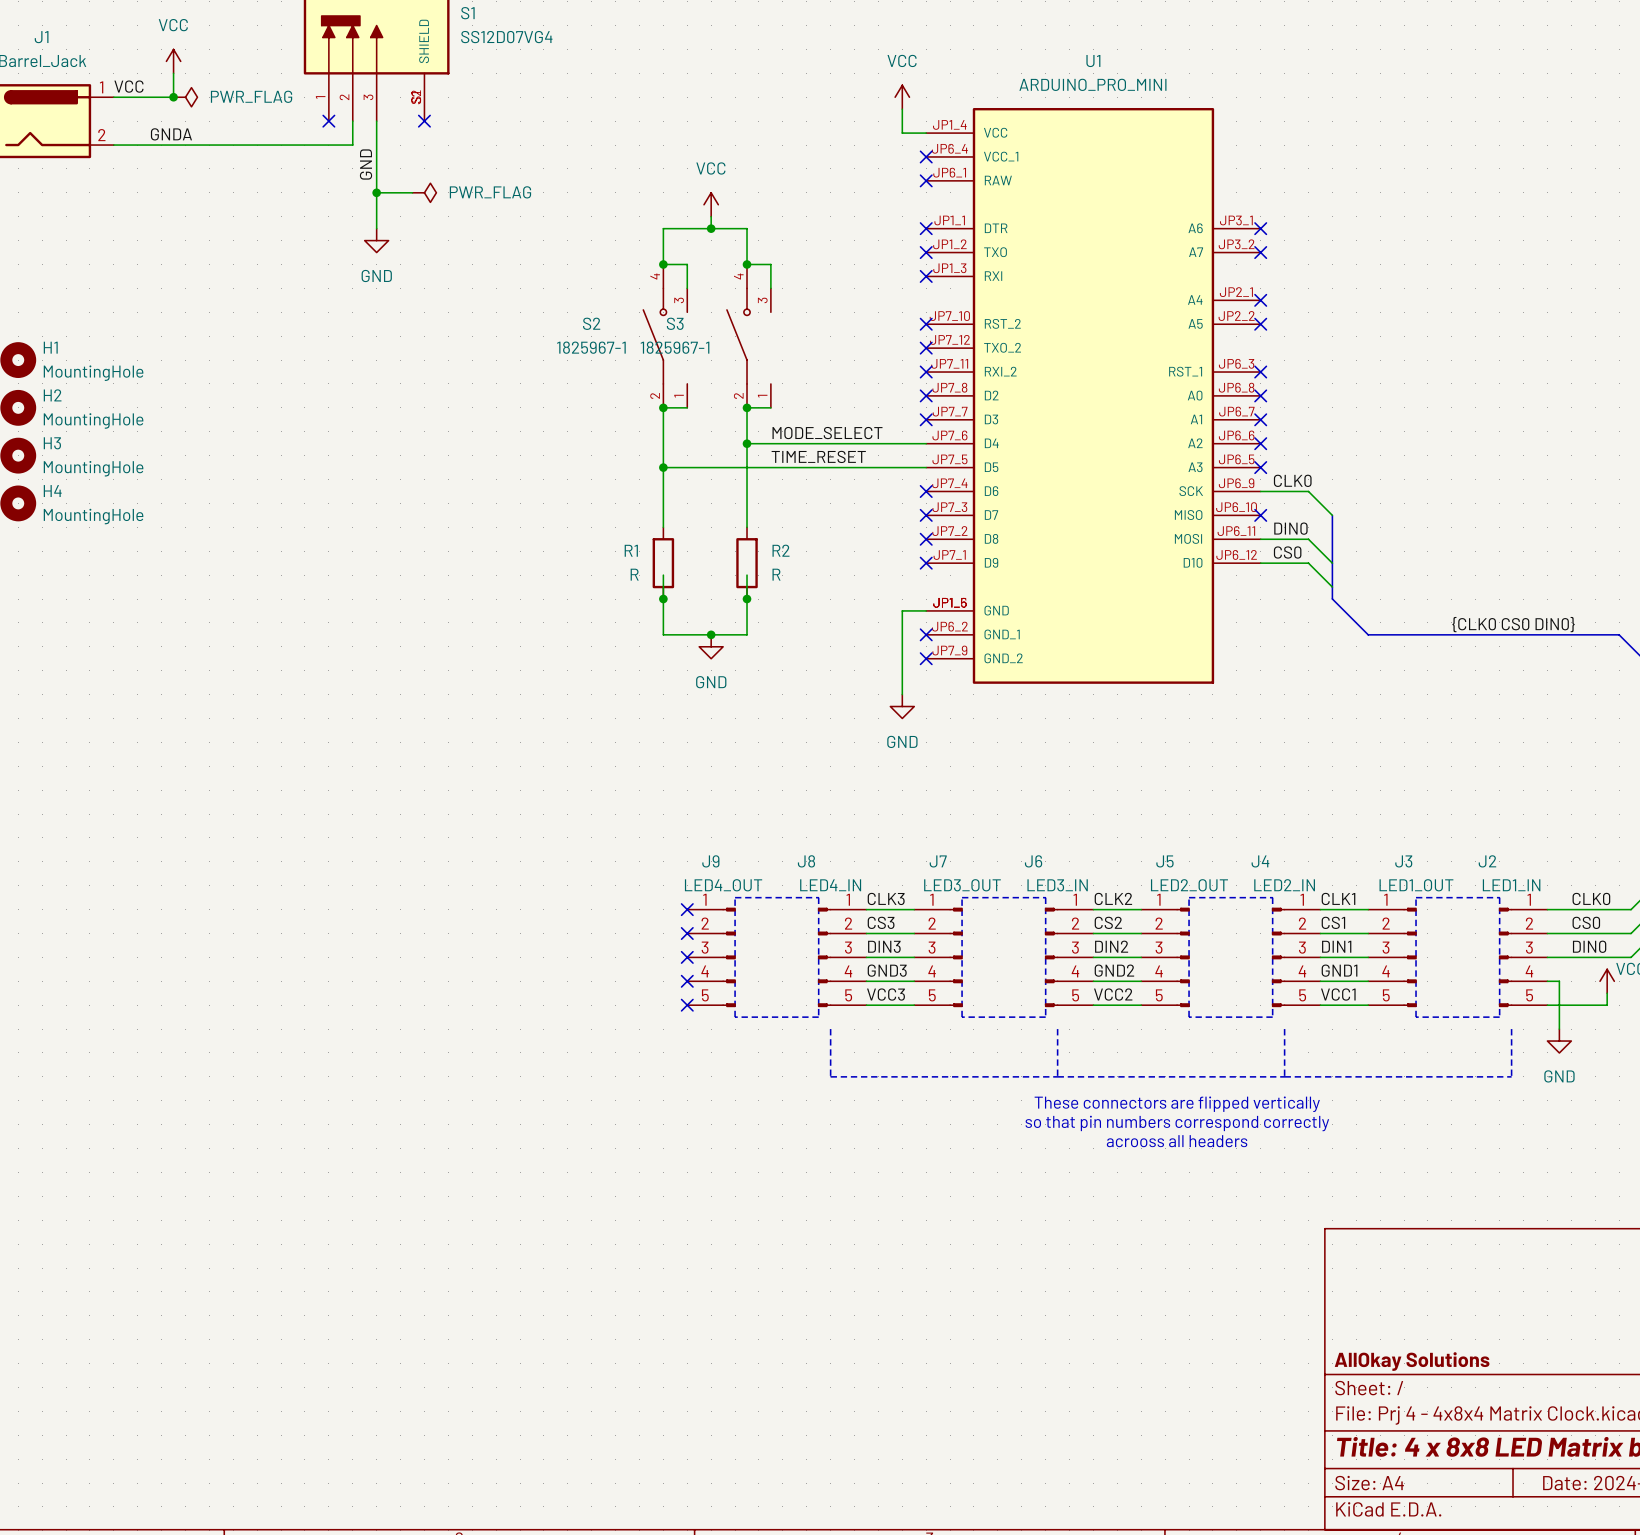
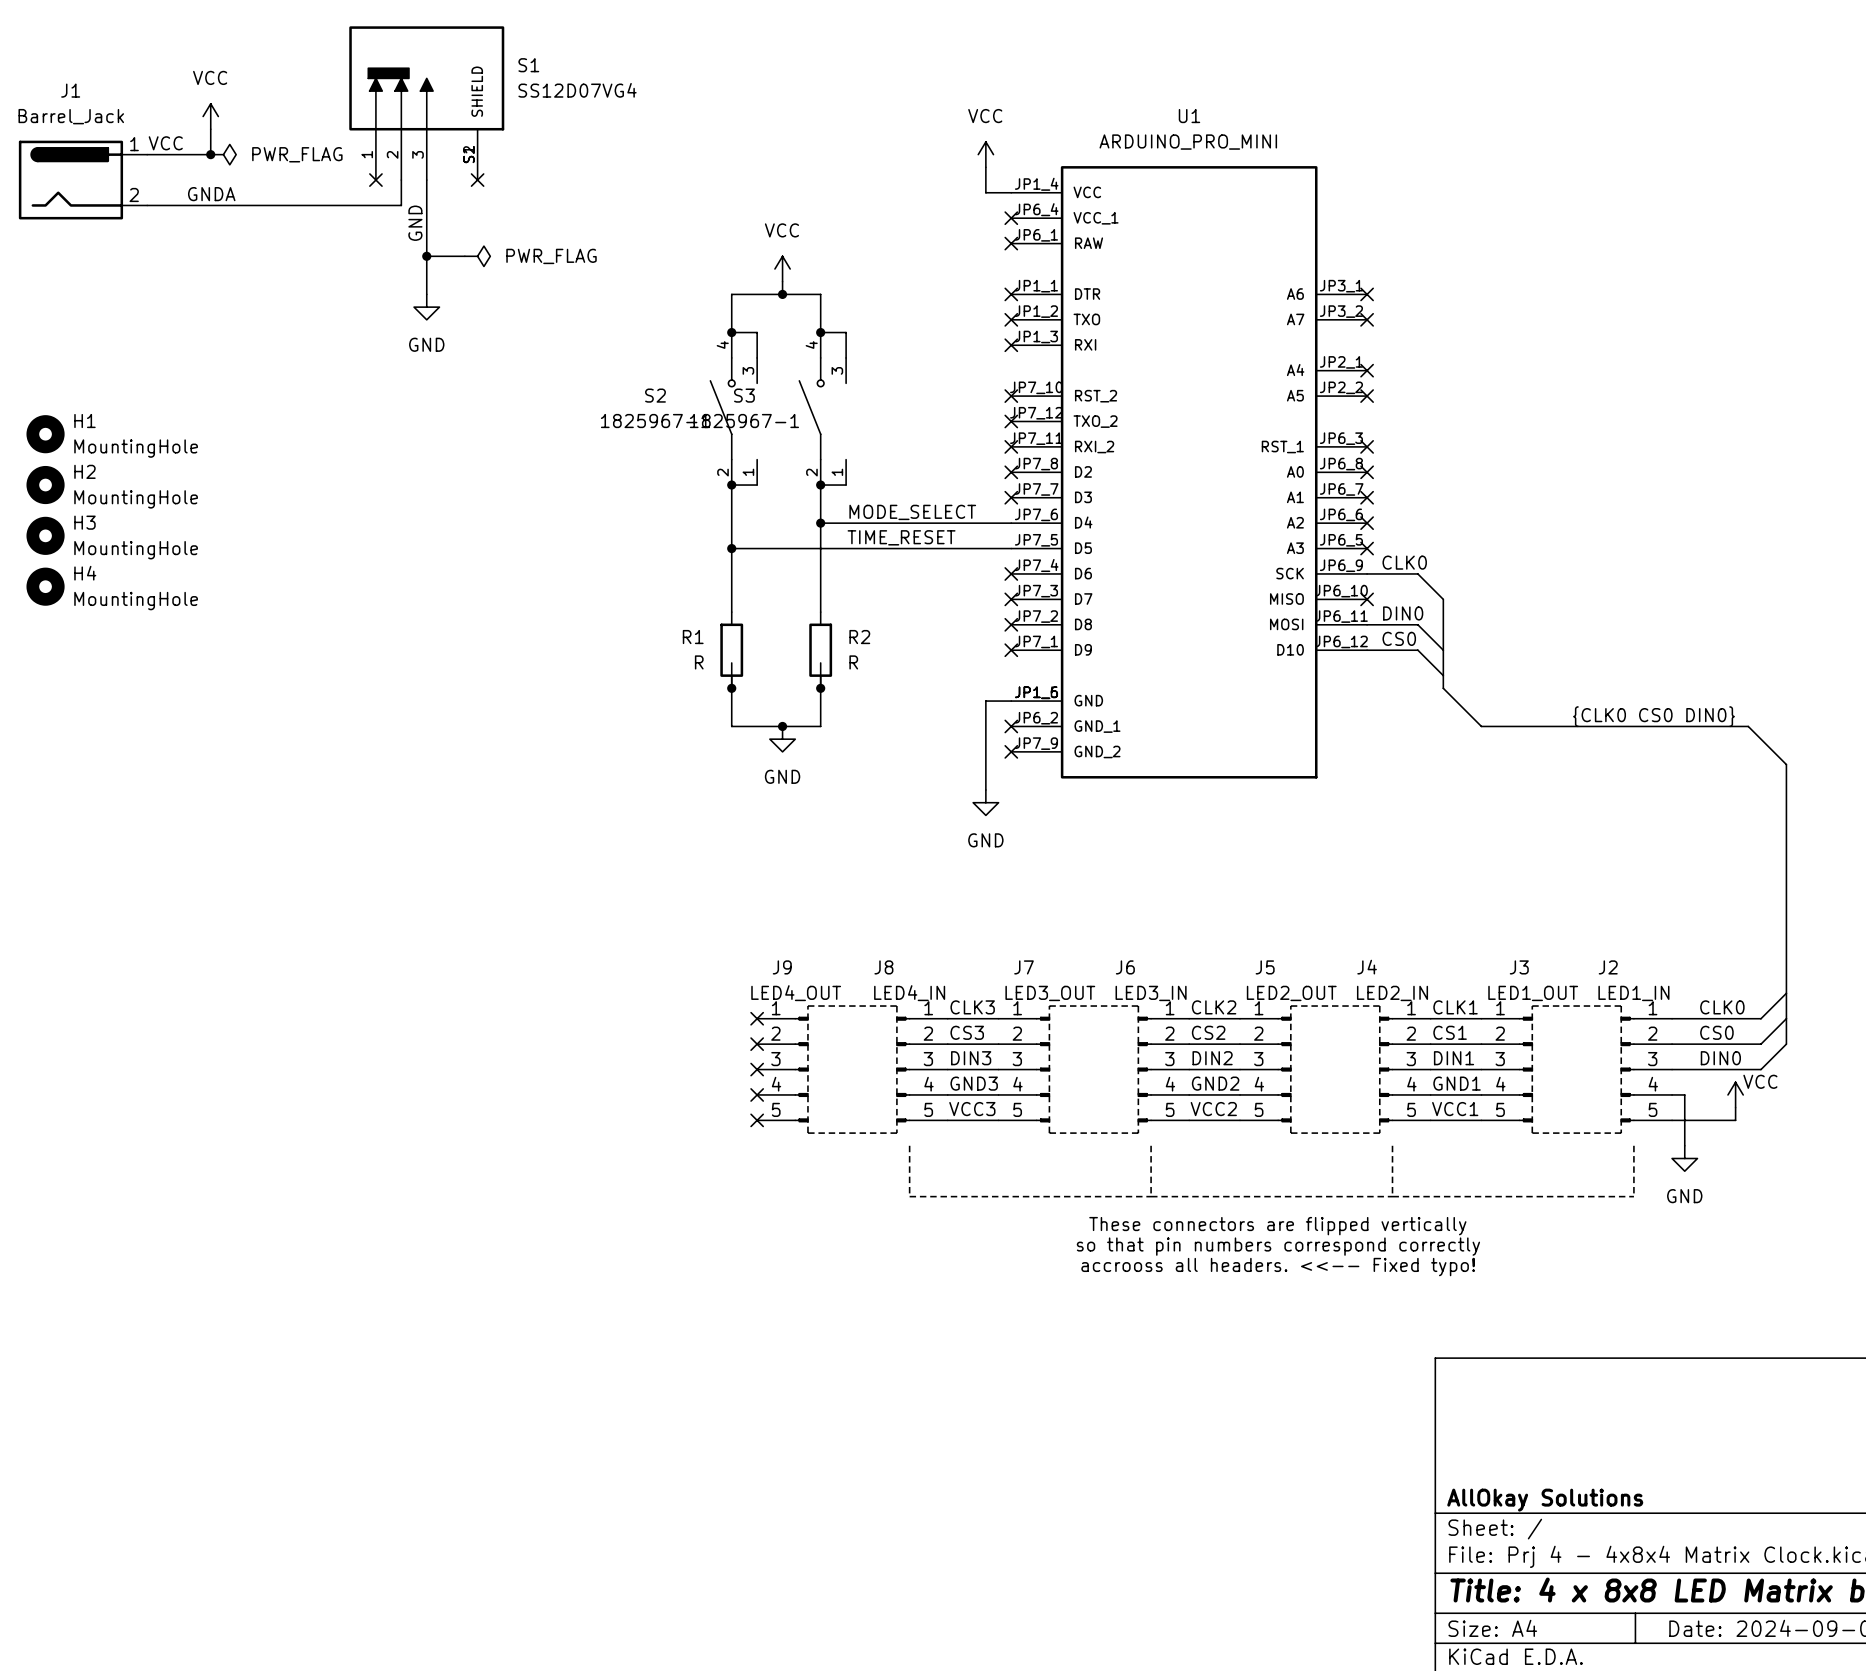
text: acrooss all headers (1177, 1141) -> accrooss all headers. <<-- Fixed typo! (1278, 1267)

